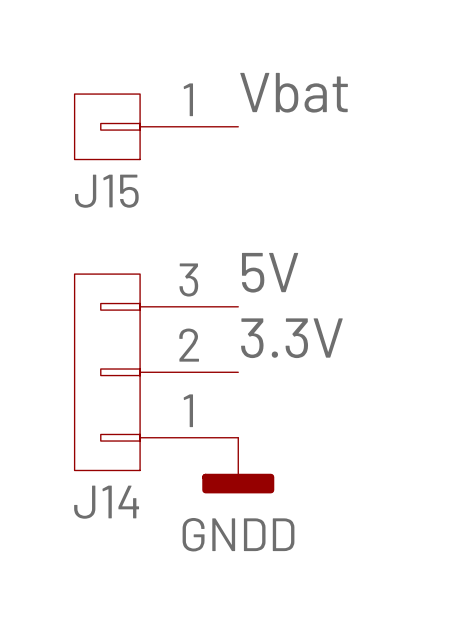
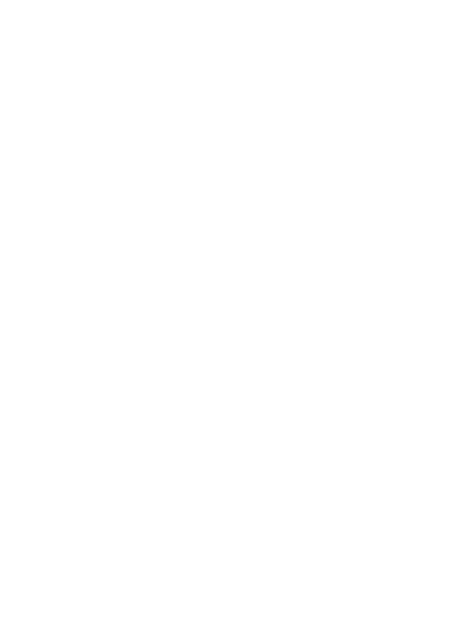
label: Vbat (294, 92) -> none
J15: (156, 126) -> none
label: 5V (270, 272) -> none
label: 3.3V (291, 338) -> none
J14: (156, 372) -> none
power symbol: GNDD (238, 465) -> none

